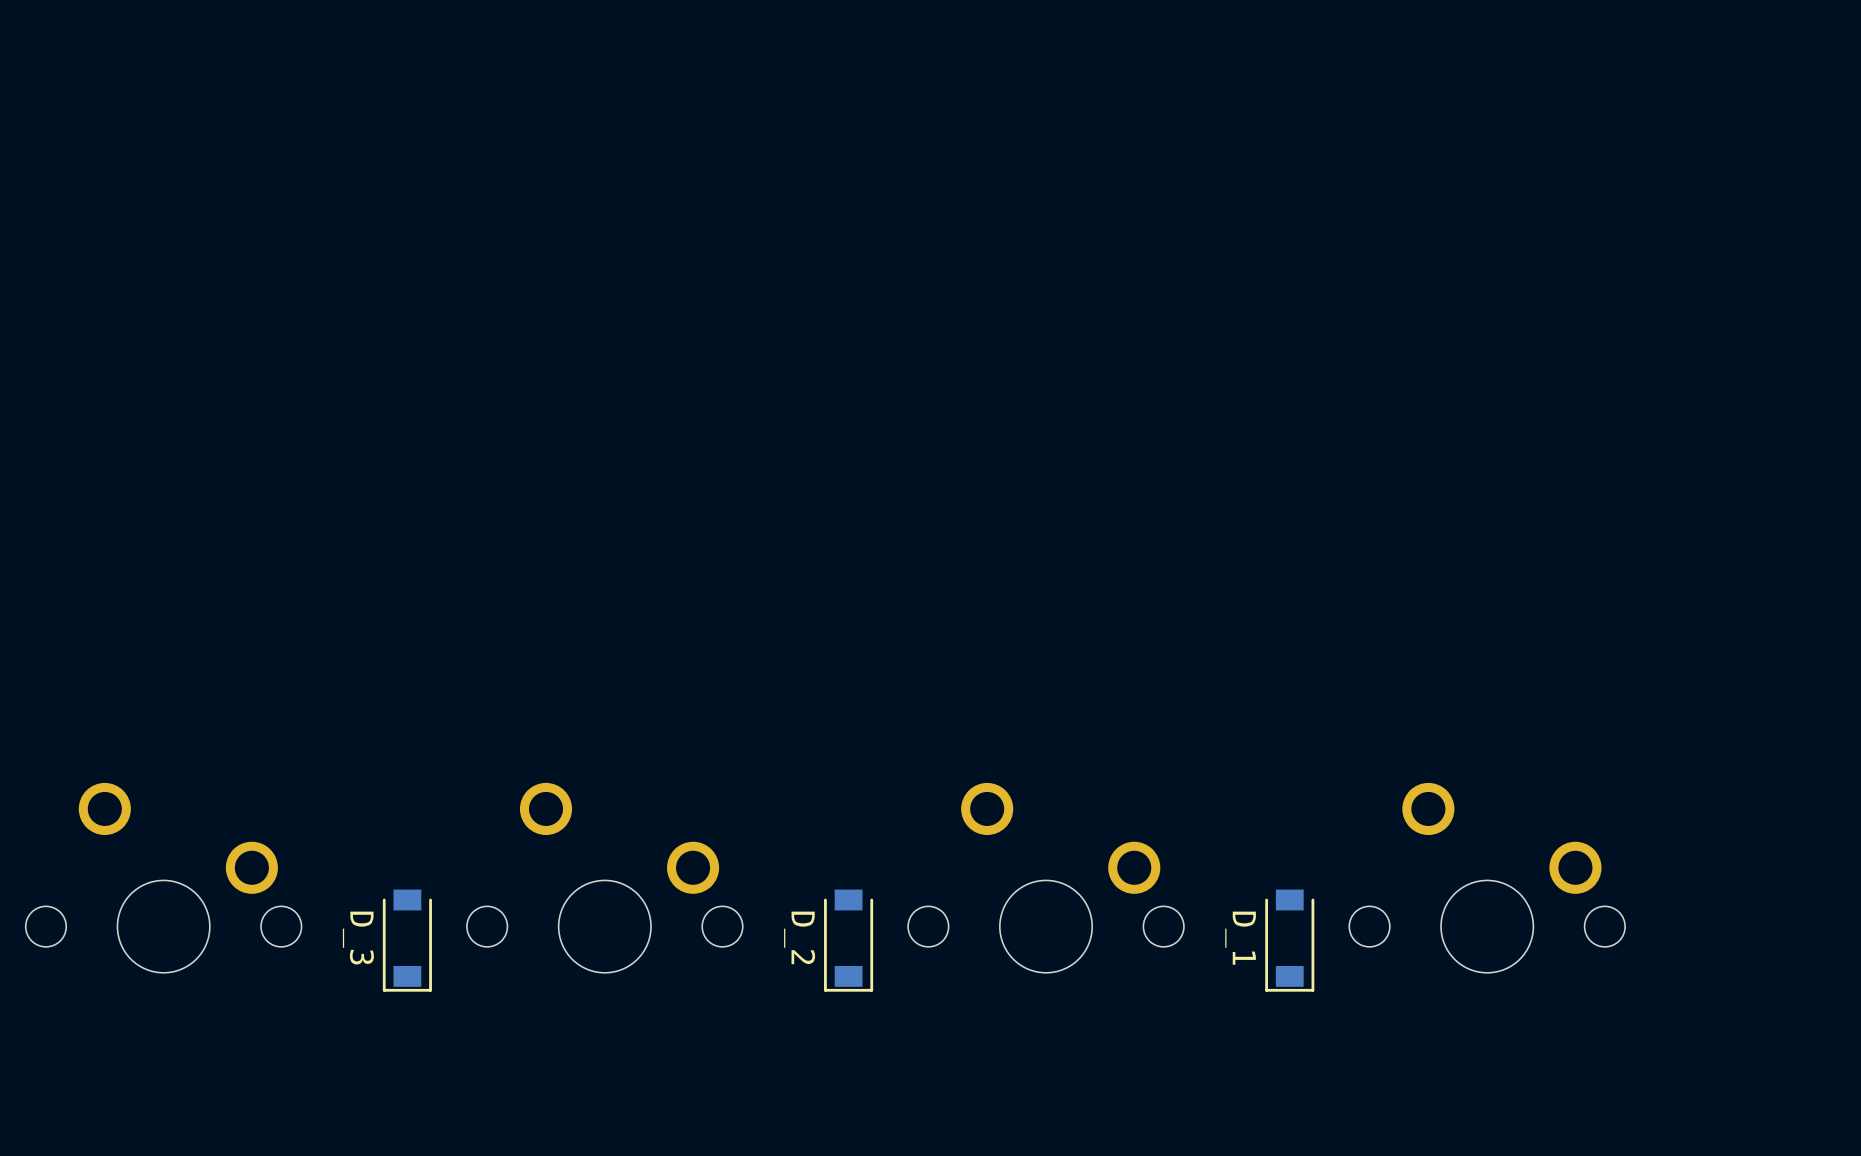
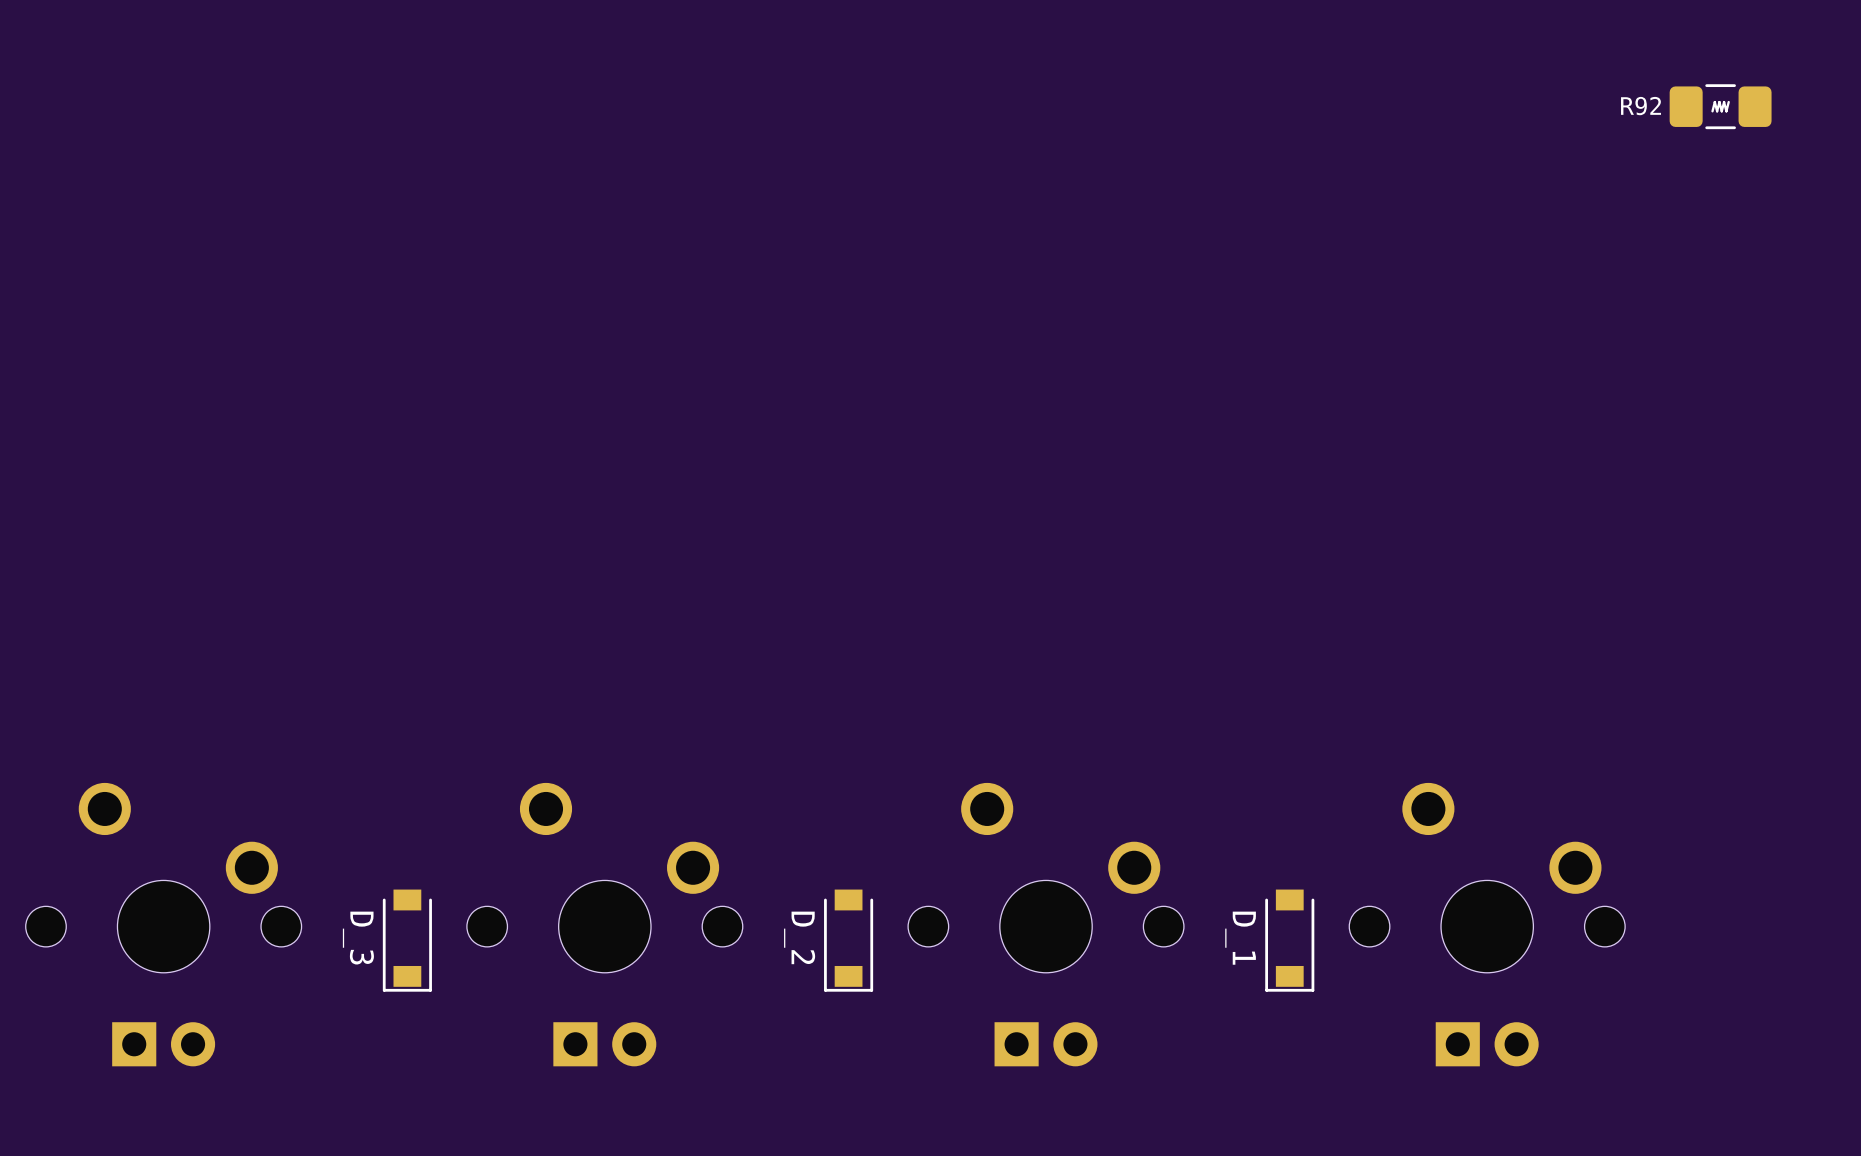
R92: none -> (1720, 106)
part: none -> (163, 924)
part: none -> (604, 924)
part: none -> (1046, 924)
part: none -> (1487, 924)

